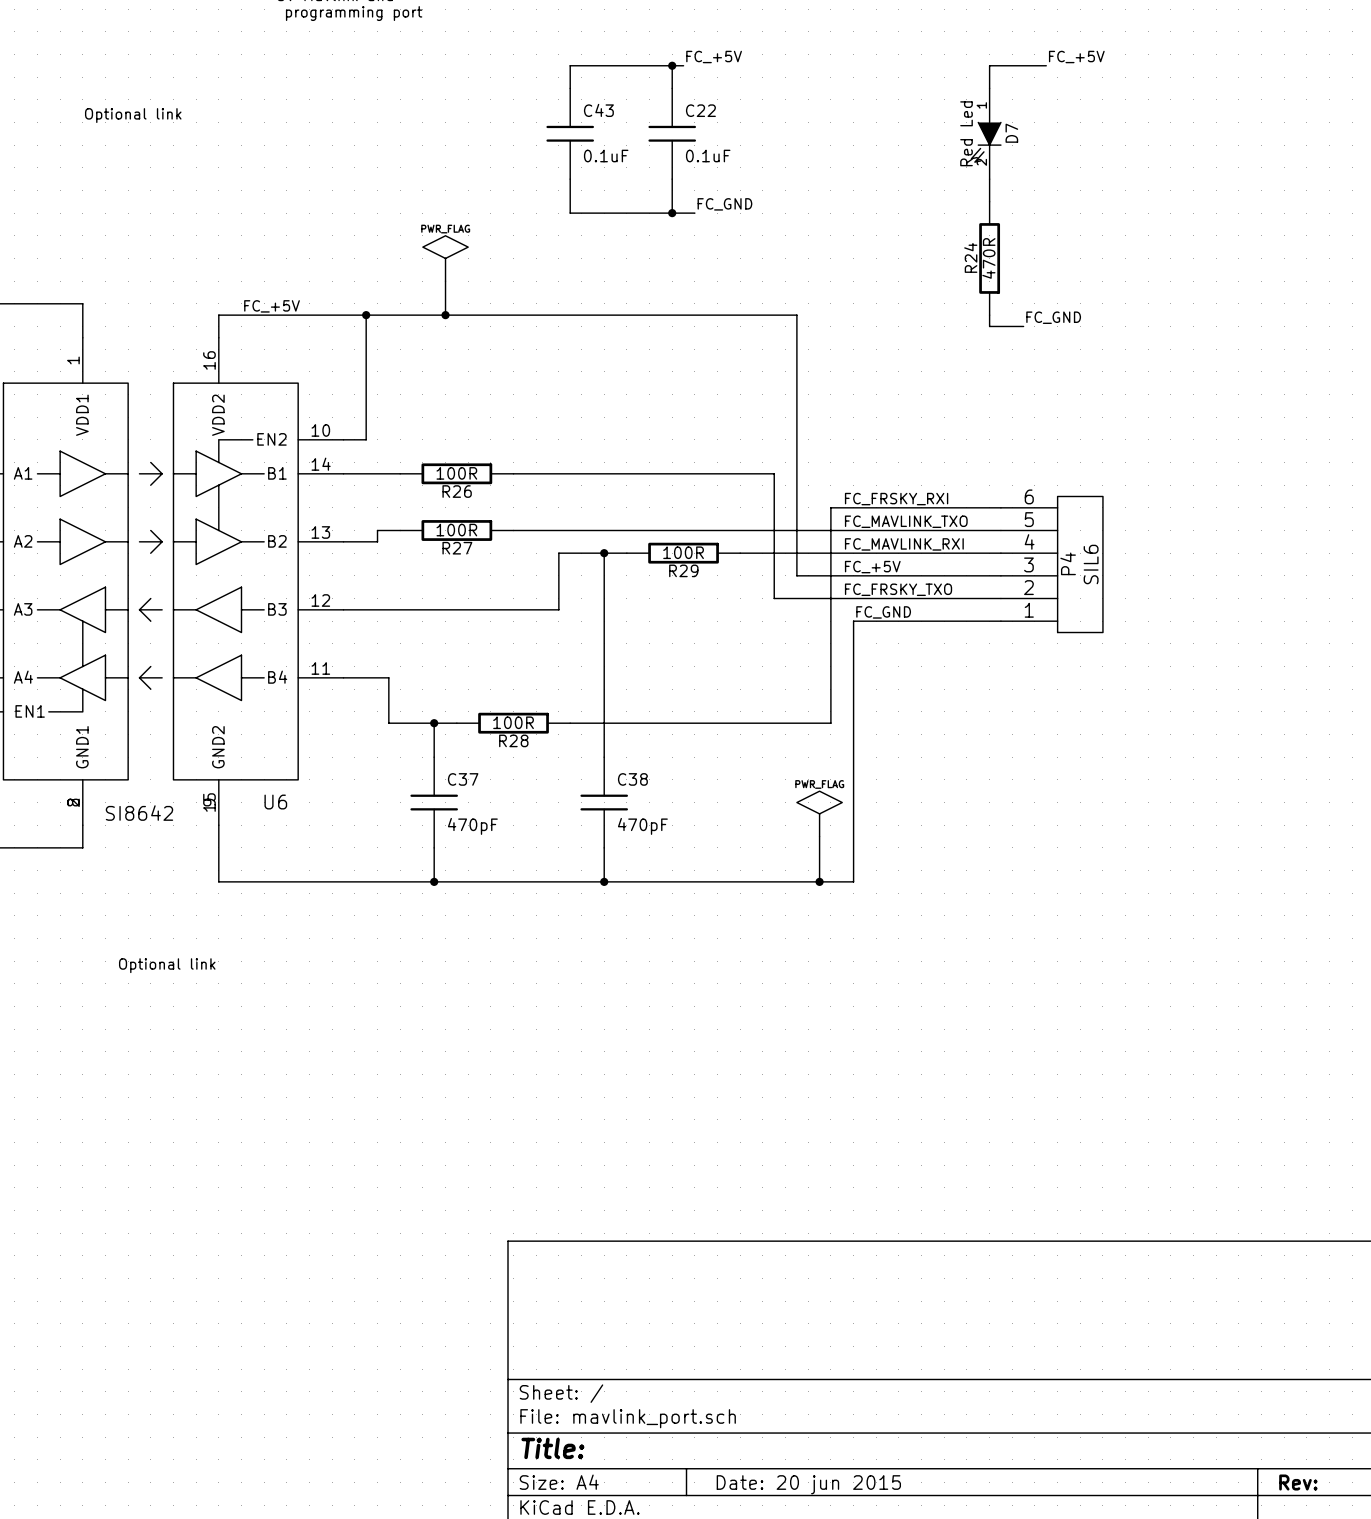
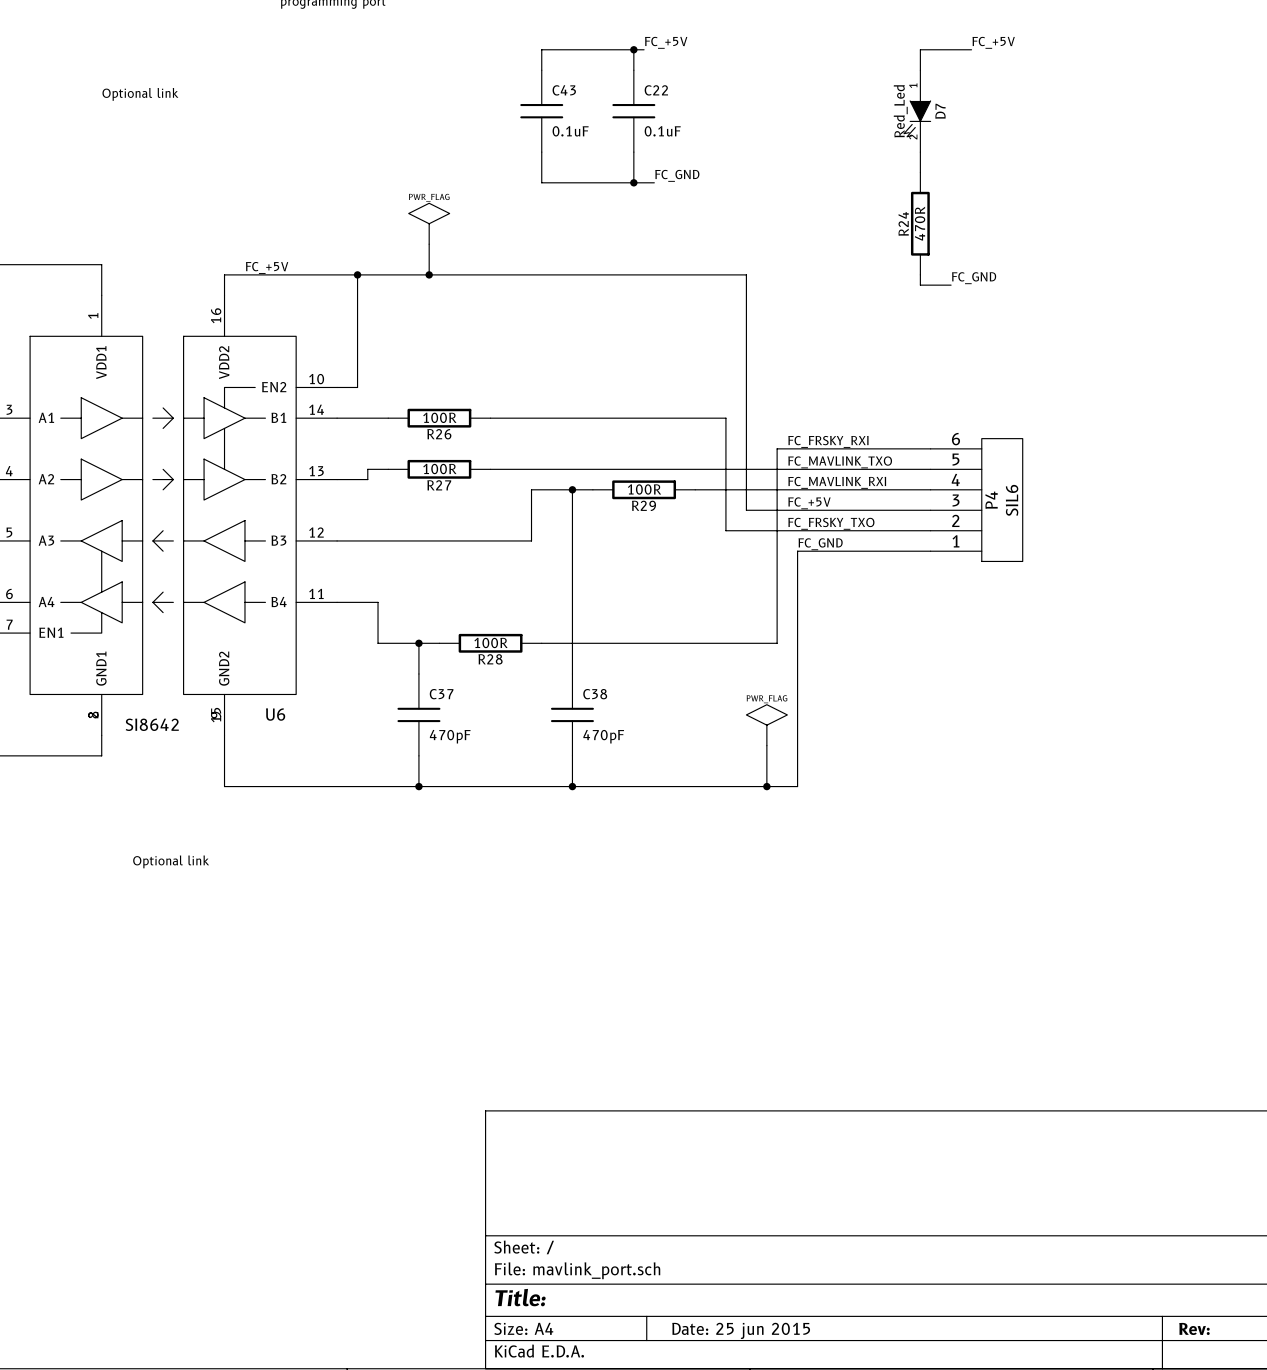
D7 value: Red Led (966, 133) -> Red_Led (900, 111)
title block: Date: 20 jun 2015 (808, 1484) -> Date: 25 jun 2015 (741, 1330)

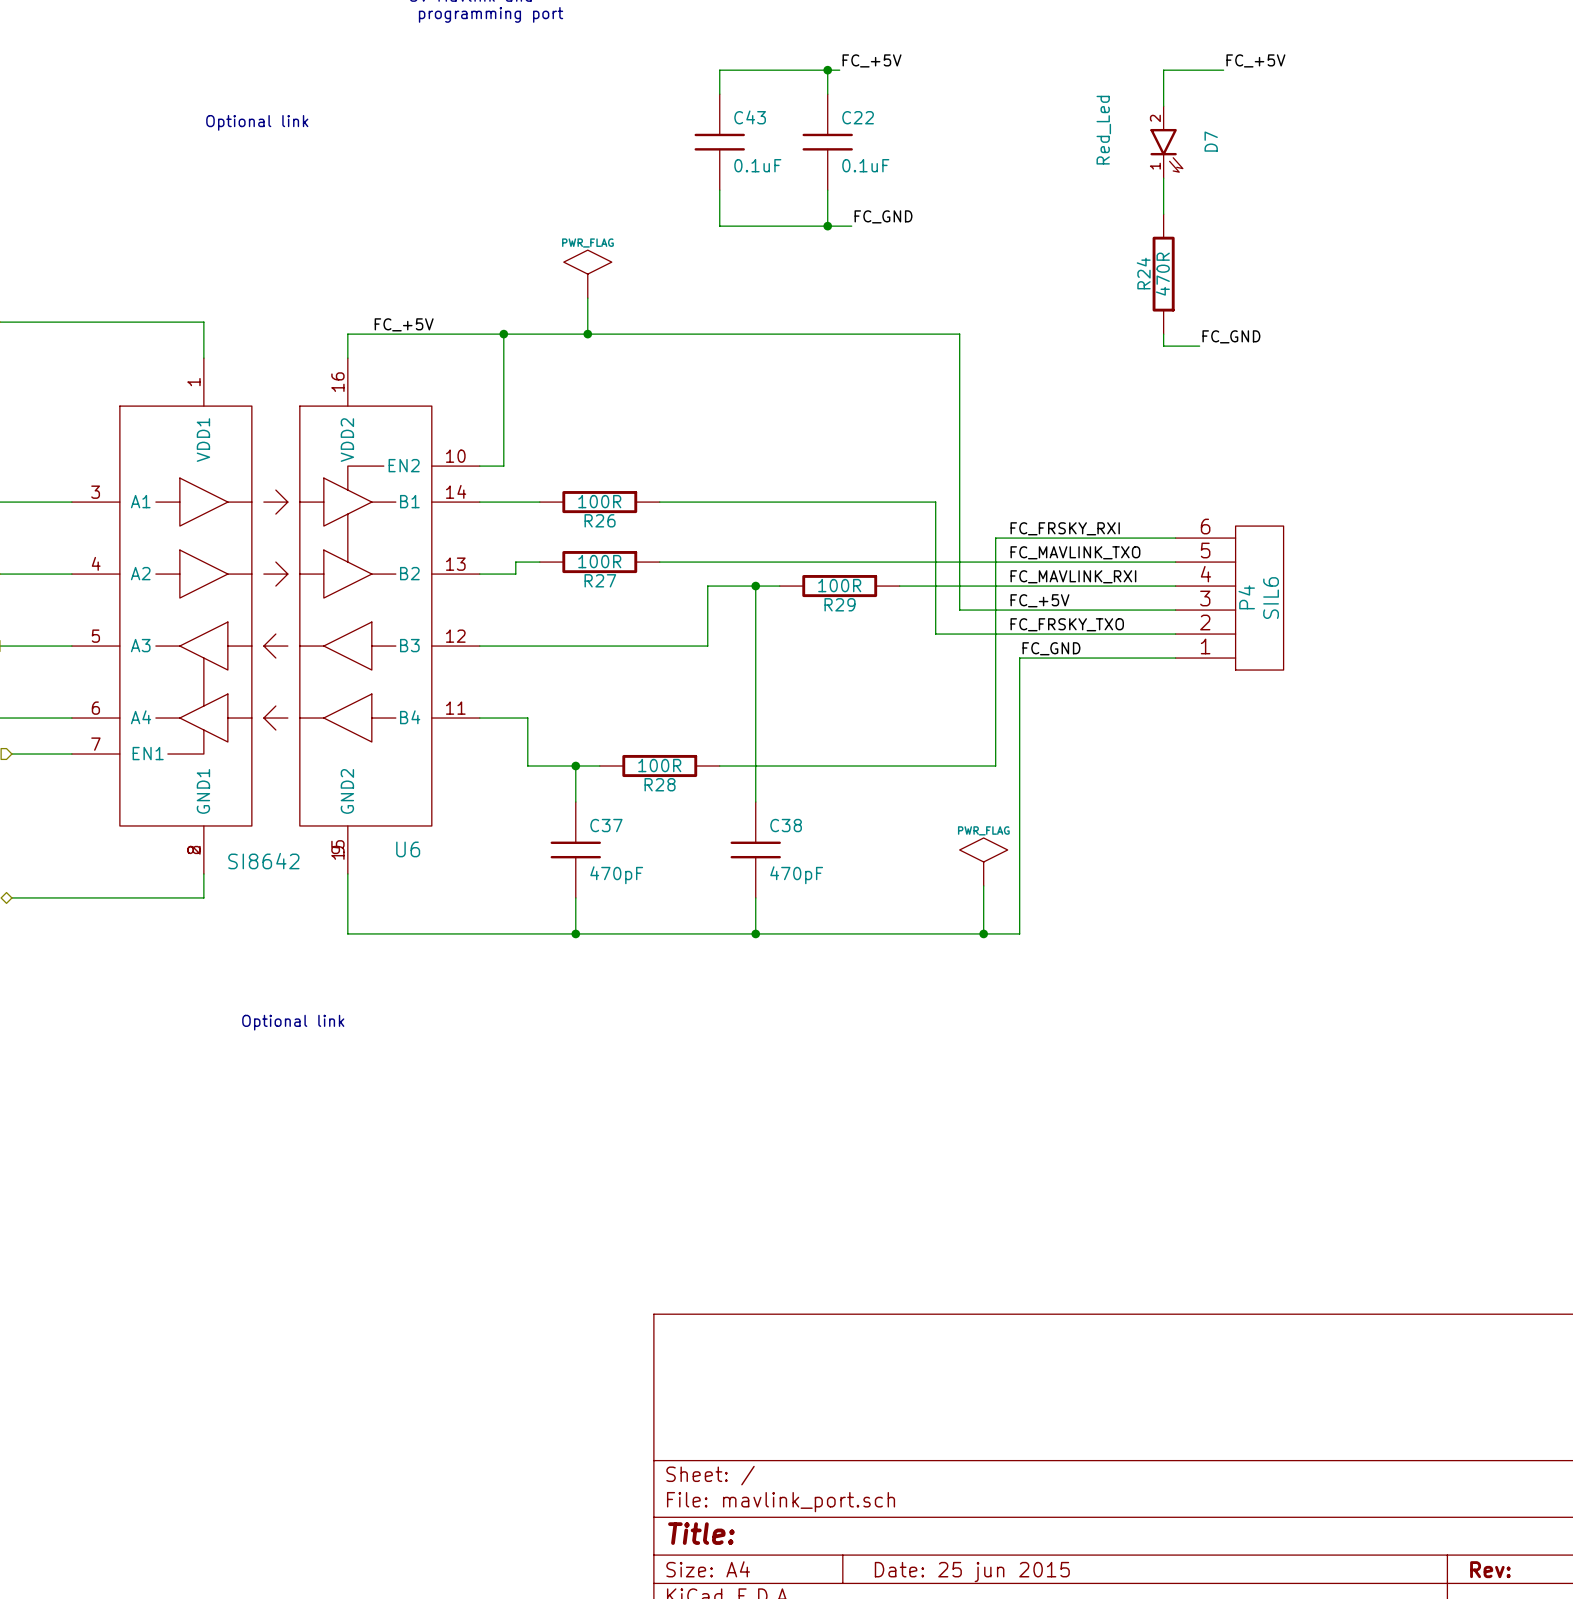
D7 symbol: [904, 70, 931, 153] -> [1150, 106, 1183, 179]
D7 value position: Red_Led (900, 111) -> Red_Led (1103, 130)

